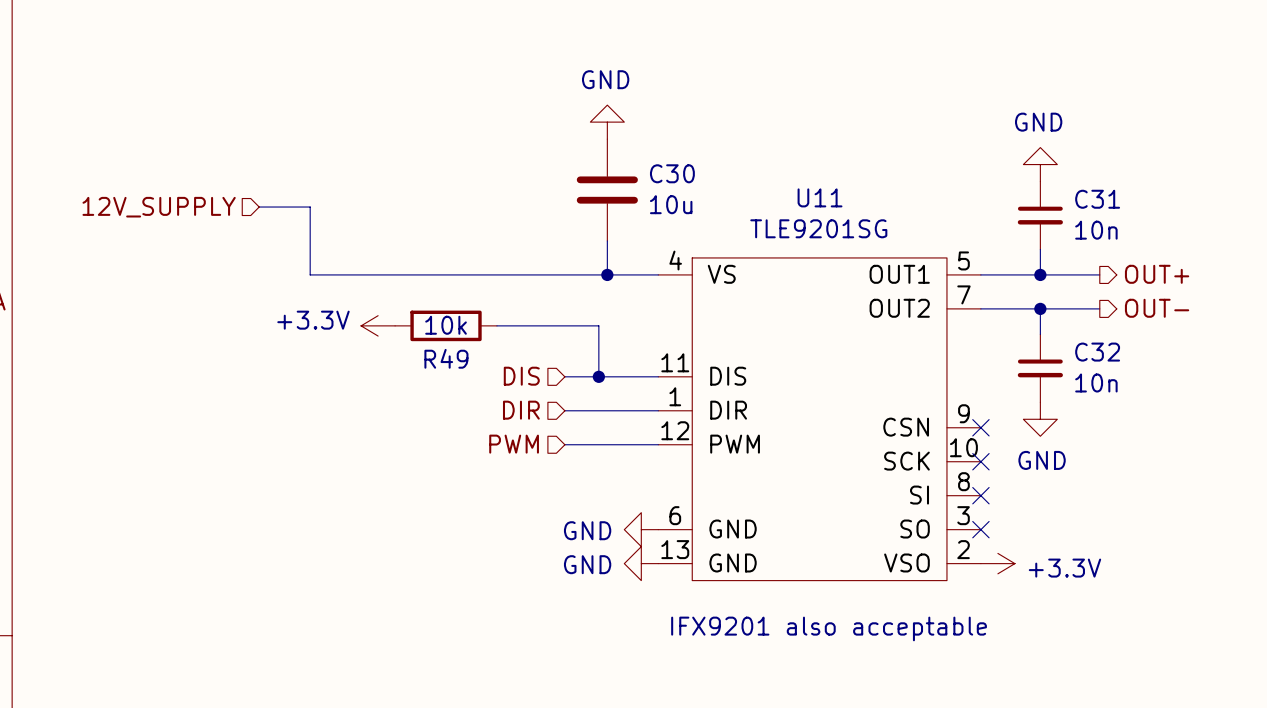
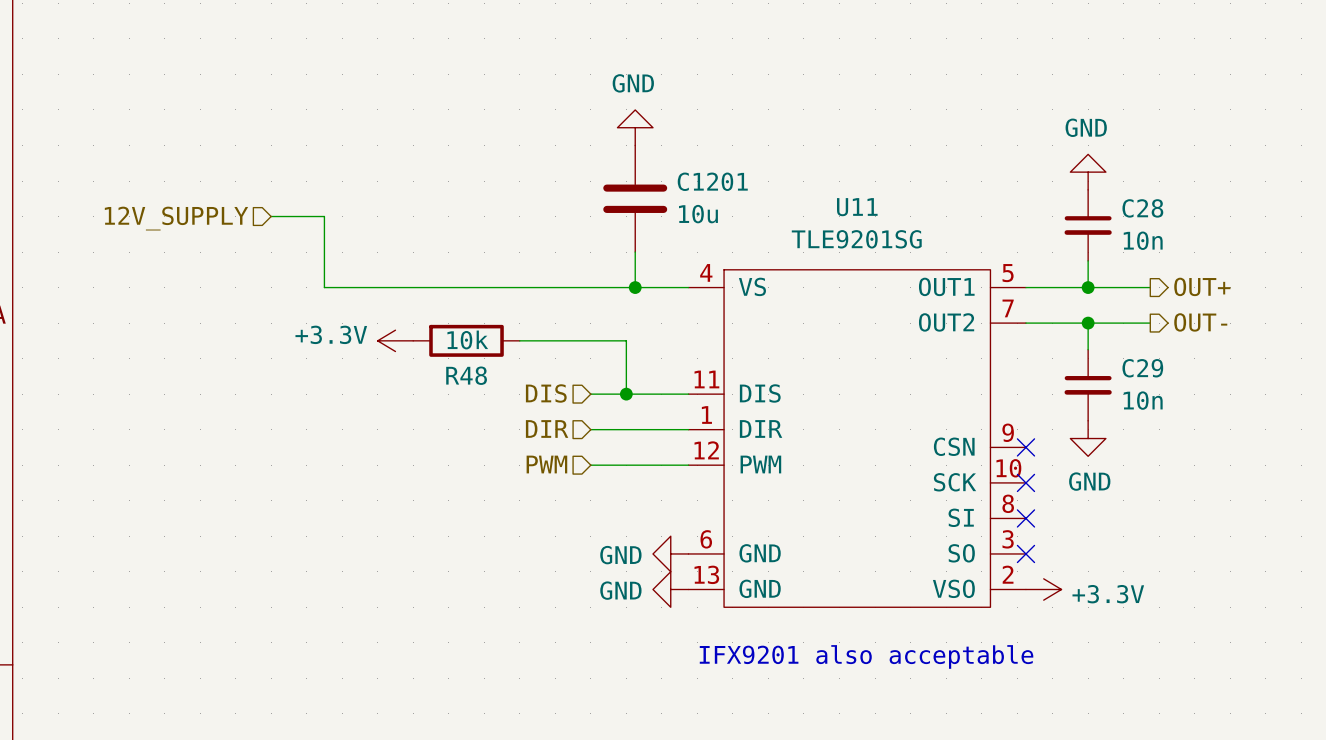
C30 name: C30 (672, 173) -> C1201 (712, 181)
C31 name: C31 (1097, 199) -> C28 (1142, 208)
C32 name: C32 (1097, 352) -> C29 (1142, 368)
R49 name: R49 (446, 358) -> R48 (466, 375)

